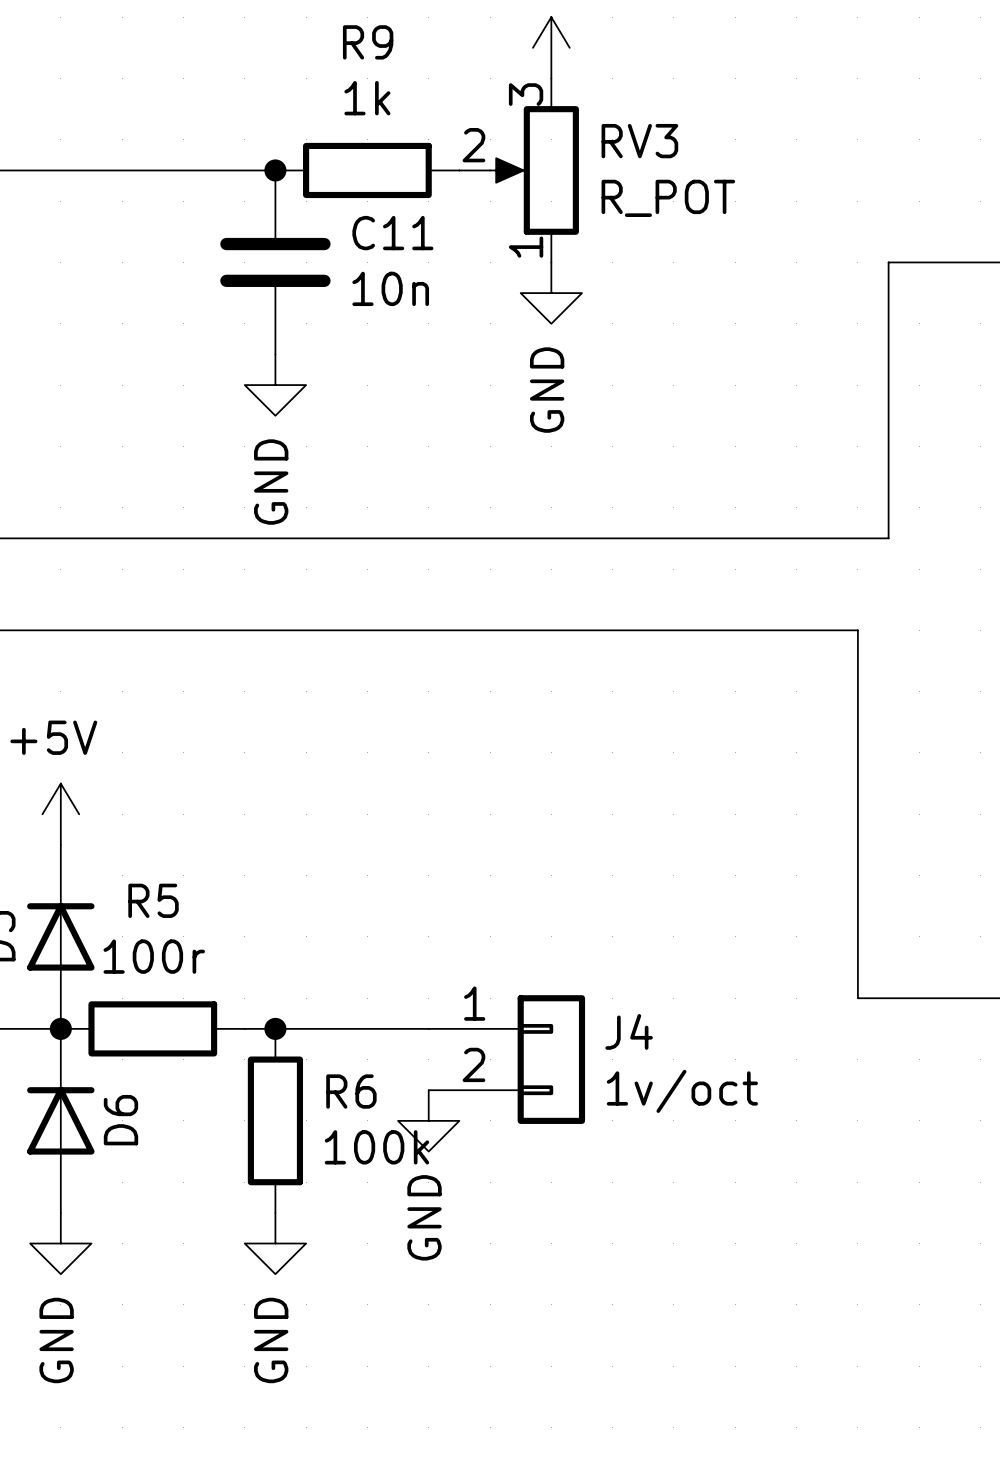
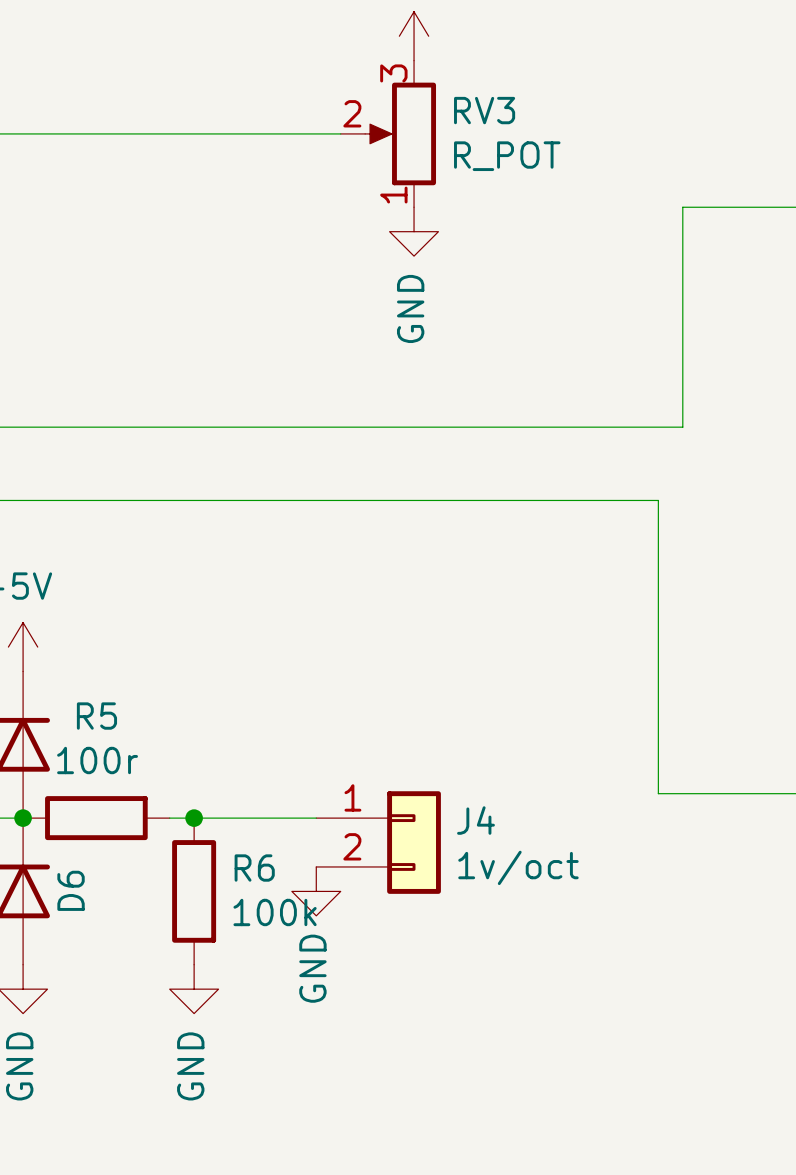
wire: none -> (194, 133) (340, 133)
junction: (275, 170) -> none
R9: 1k (367, 170) -> none
C11: 10n (275, 262) -> none
power symbol: GND (275, 385) -> none

